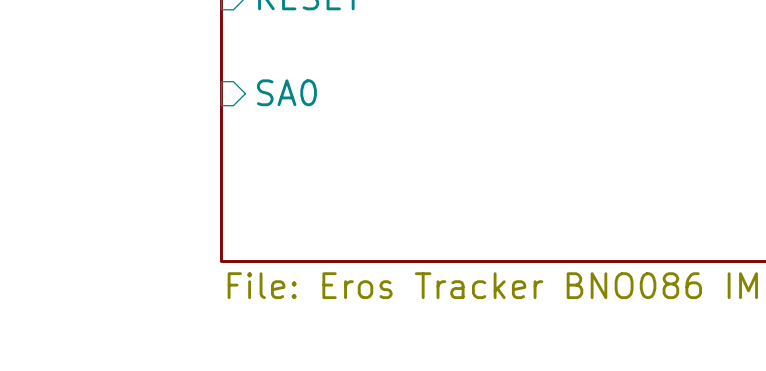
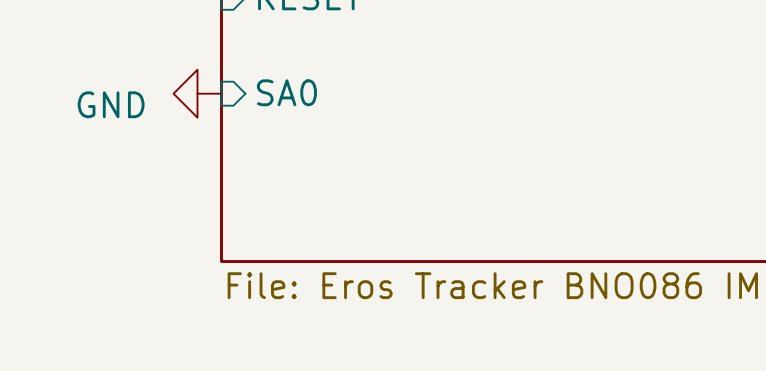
power symbol: none -> GND (197, 93)

